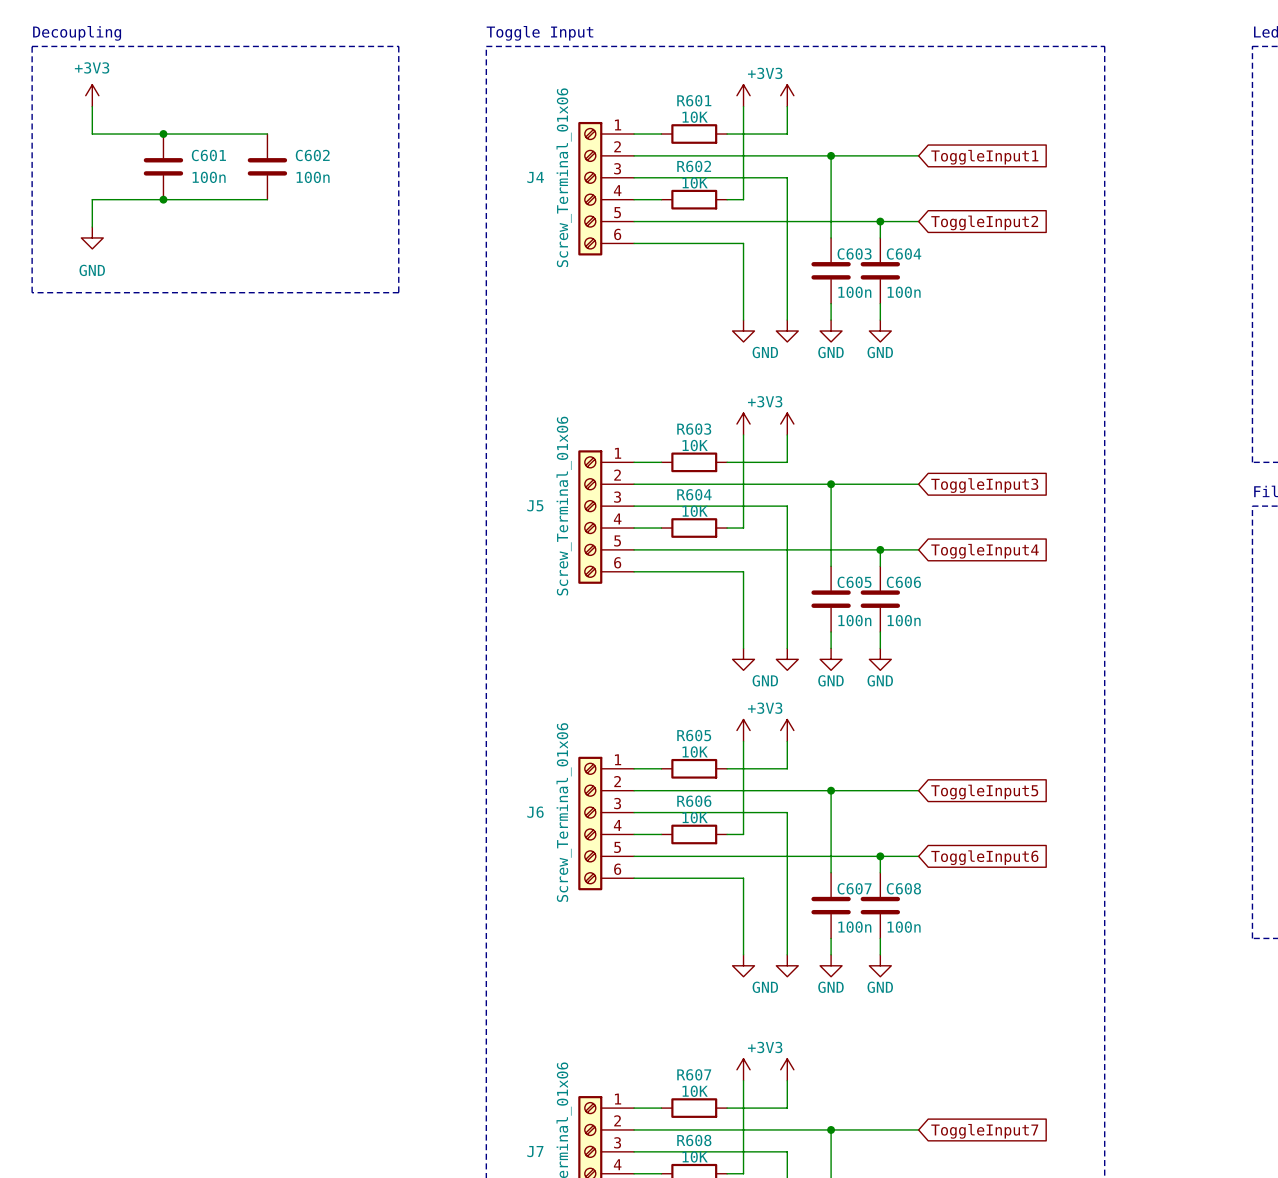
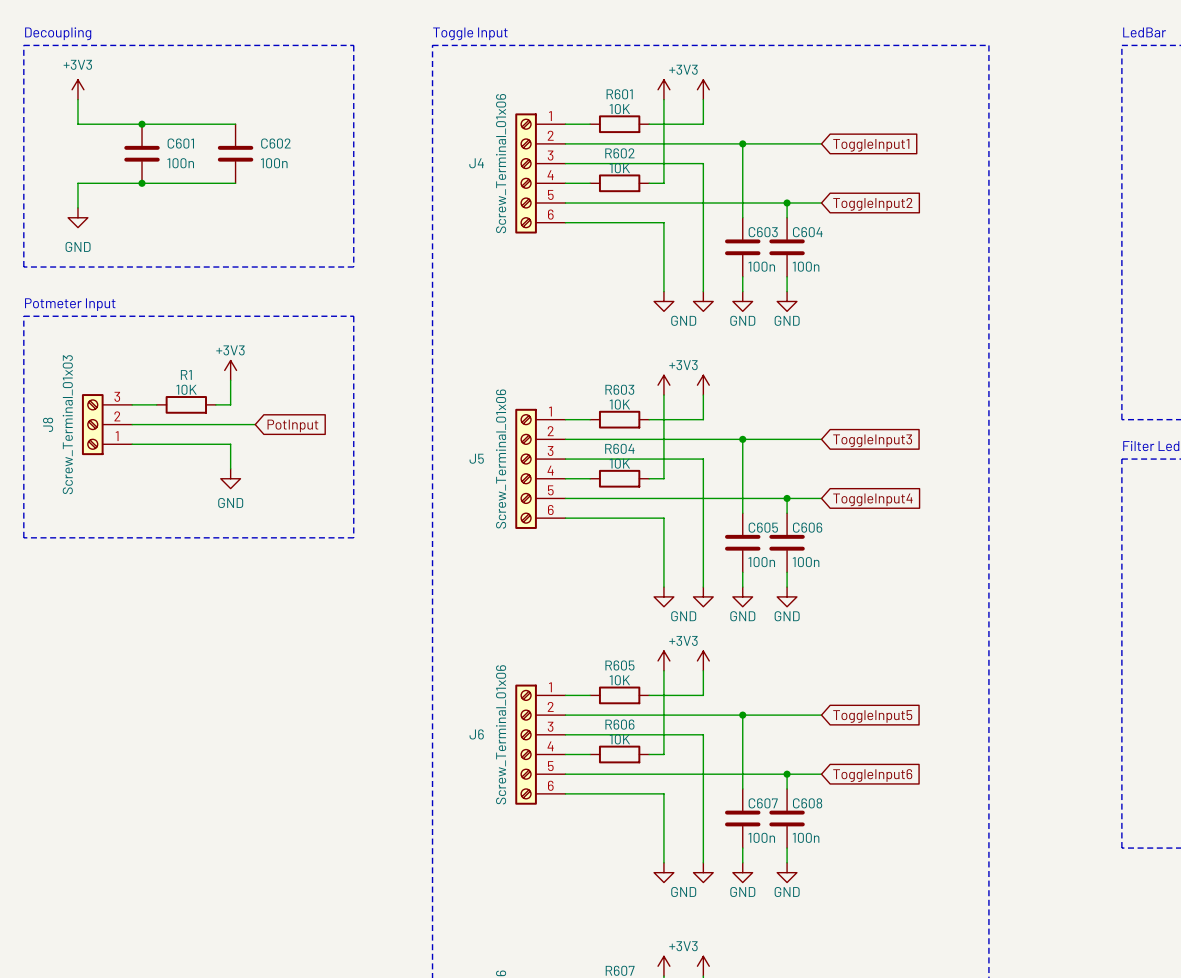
text: none -> Potmeter Input (70, 304)
line: none -> (23, 316) (353, 316) (353, 537) (23, 537) (23, 316)
power symbol: none -> +3V3 (230, 370)
wire: none -> (230, 380) (230, 404) (215, 404)
wire: none -> (132, 404) (156, 404)
R1: none -> 10K (186, 404)
J8: none -> Screw_Terminal_01x03 (107, 424)
wire: none -> (132, 424) (255, 424)
global label: none -> PotInput (292, 425)
wire: none -> (132, 444) (230, 444) (230, 468)
power symbol: none -> GND (230, 478)

